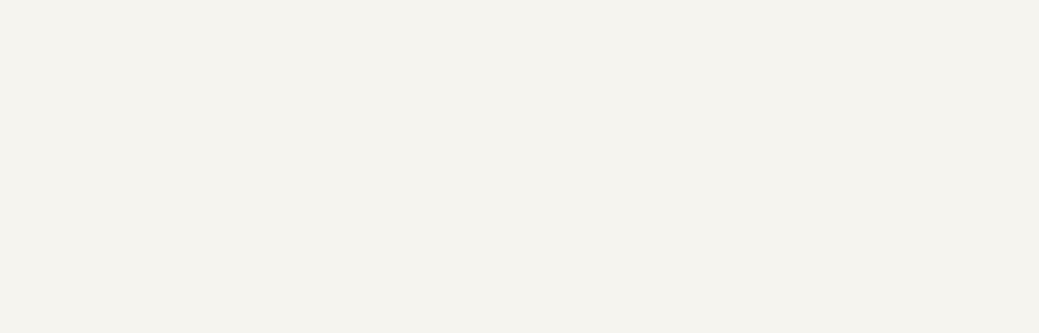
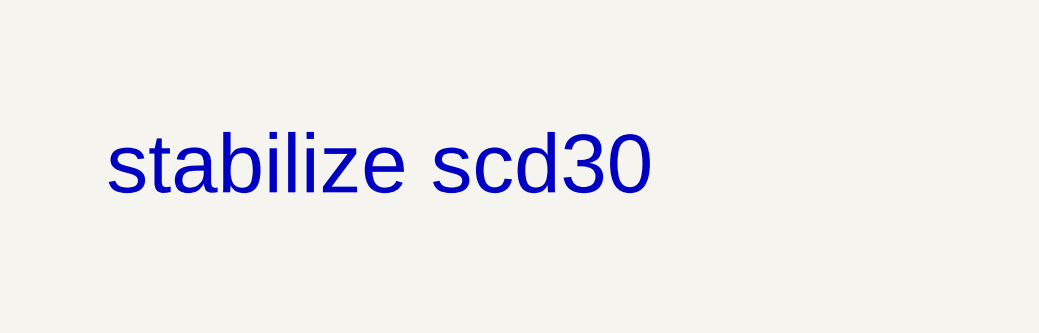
text: none -> stabilize scd30 (379, 162)

